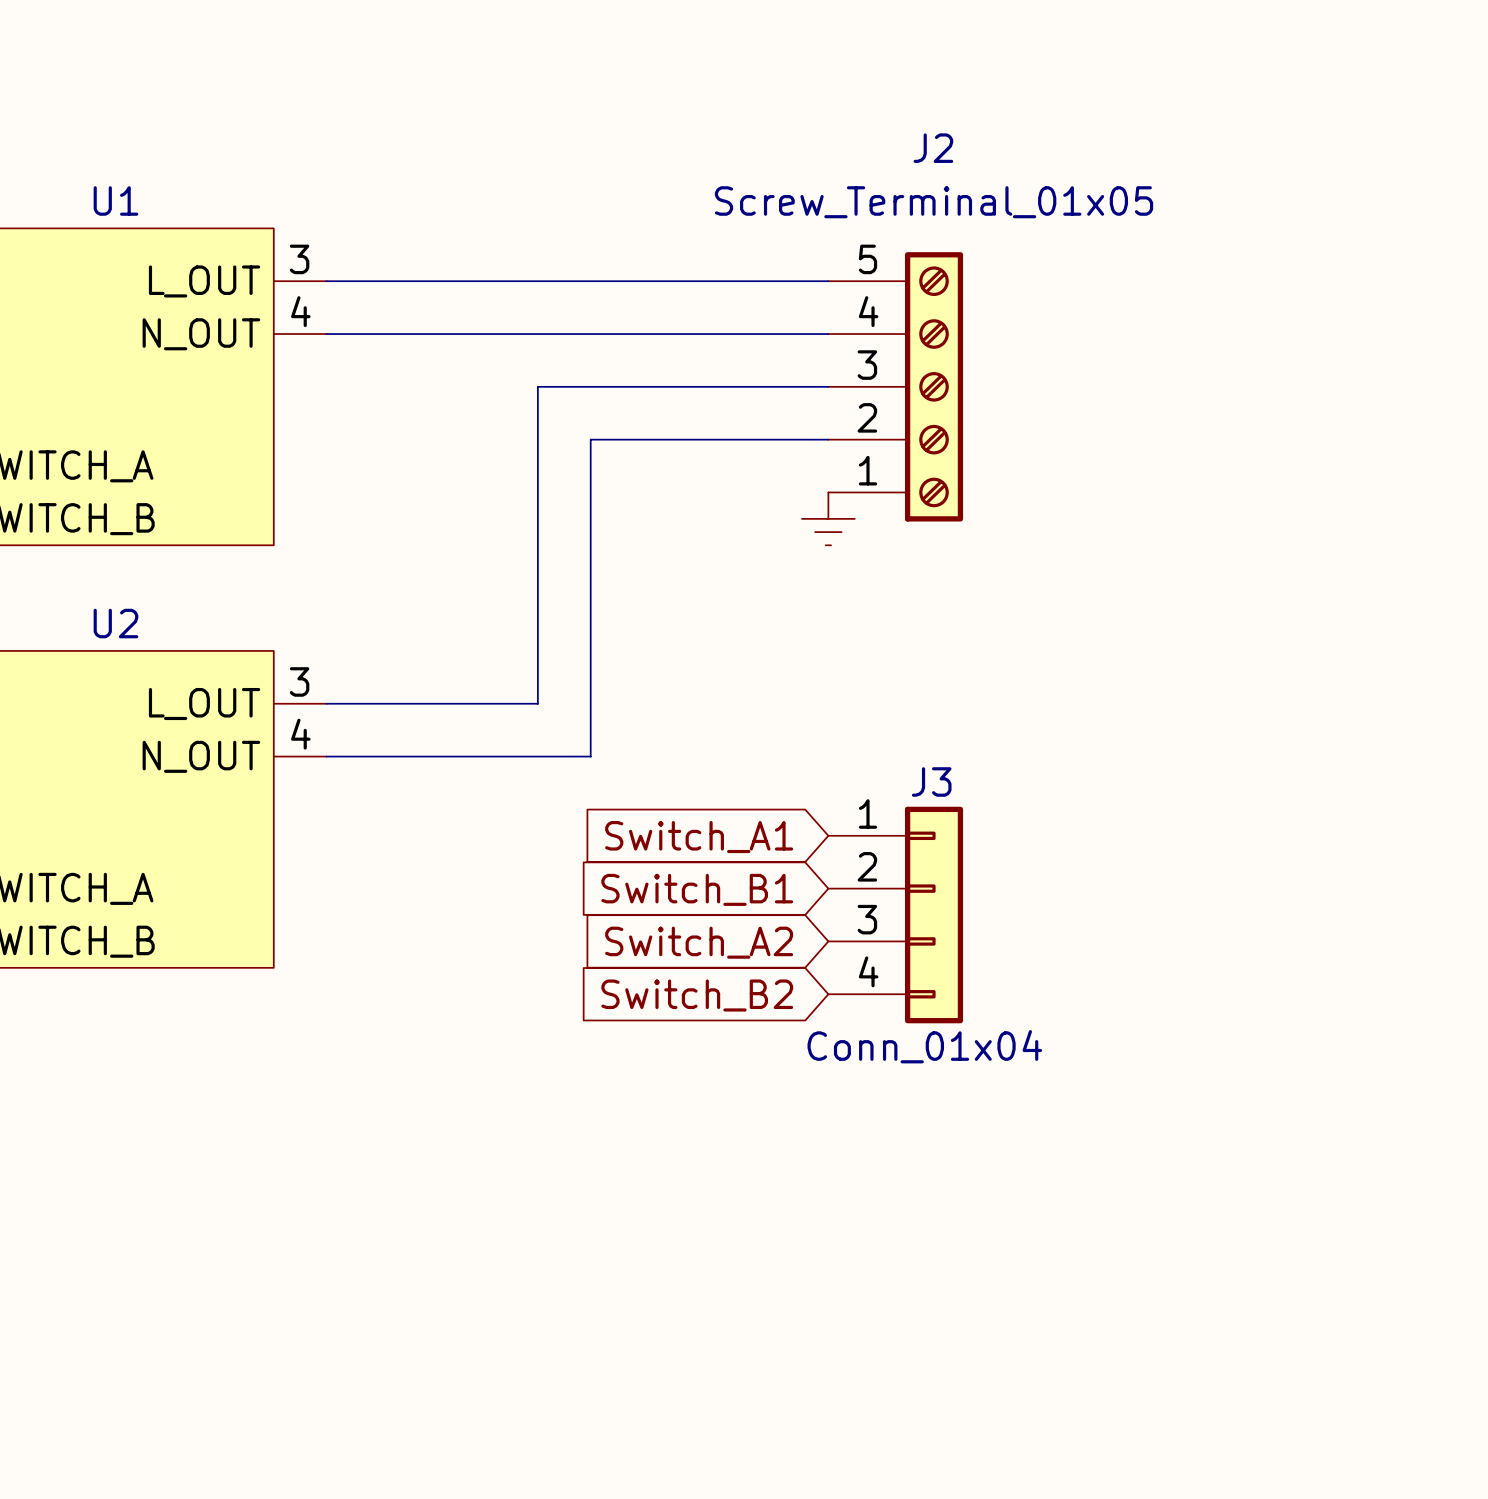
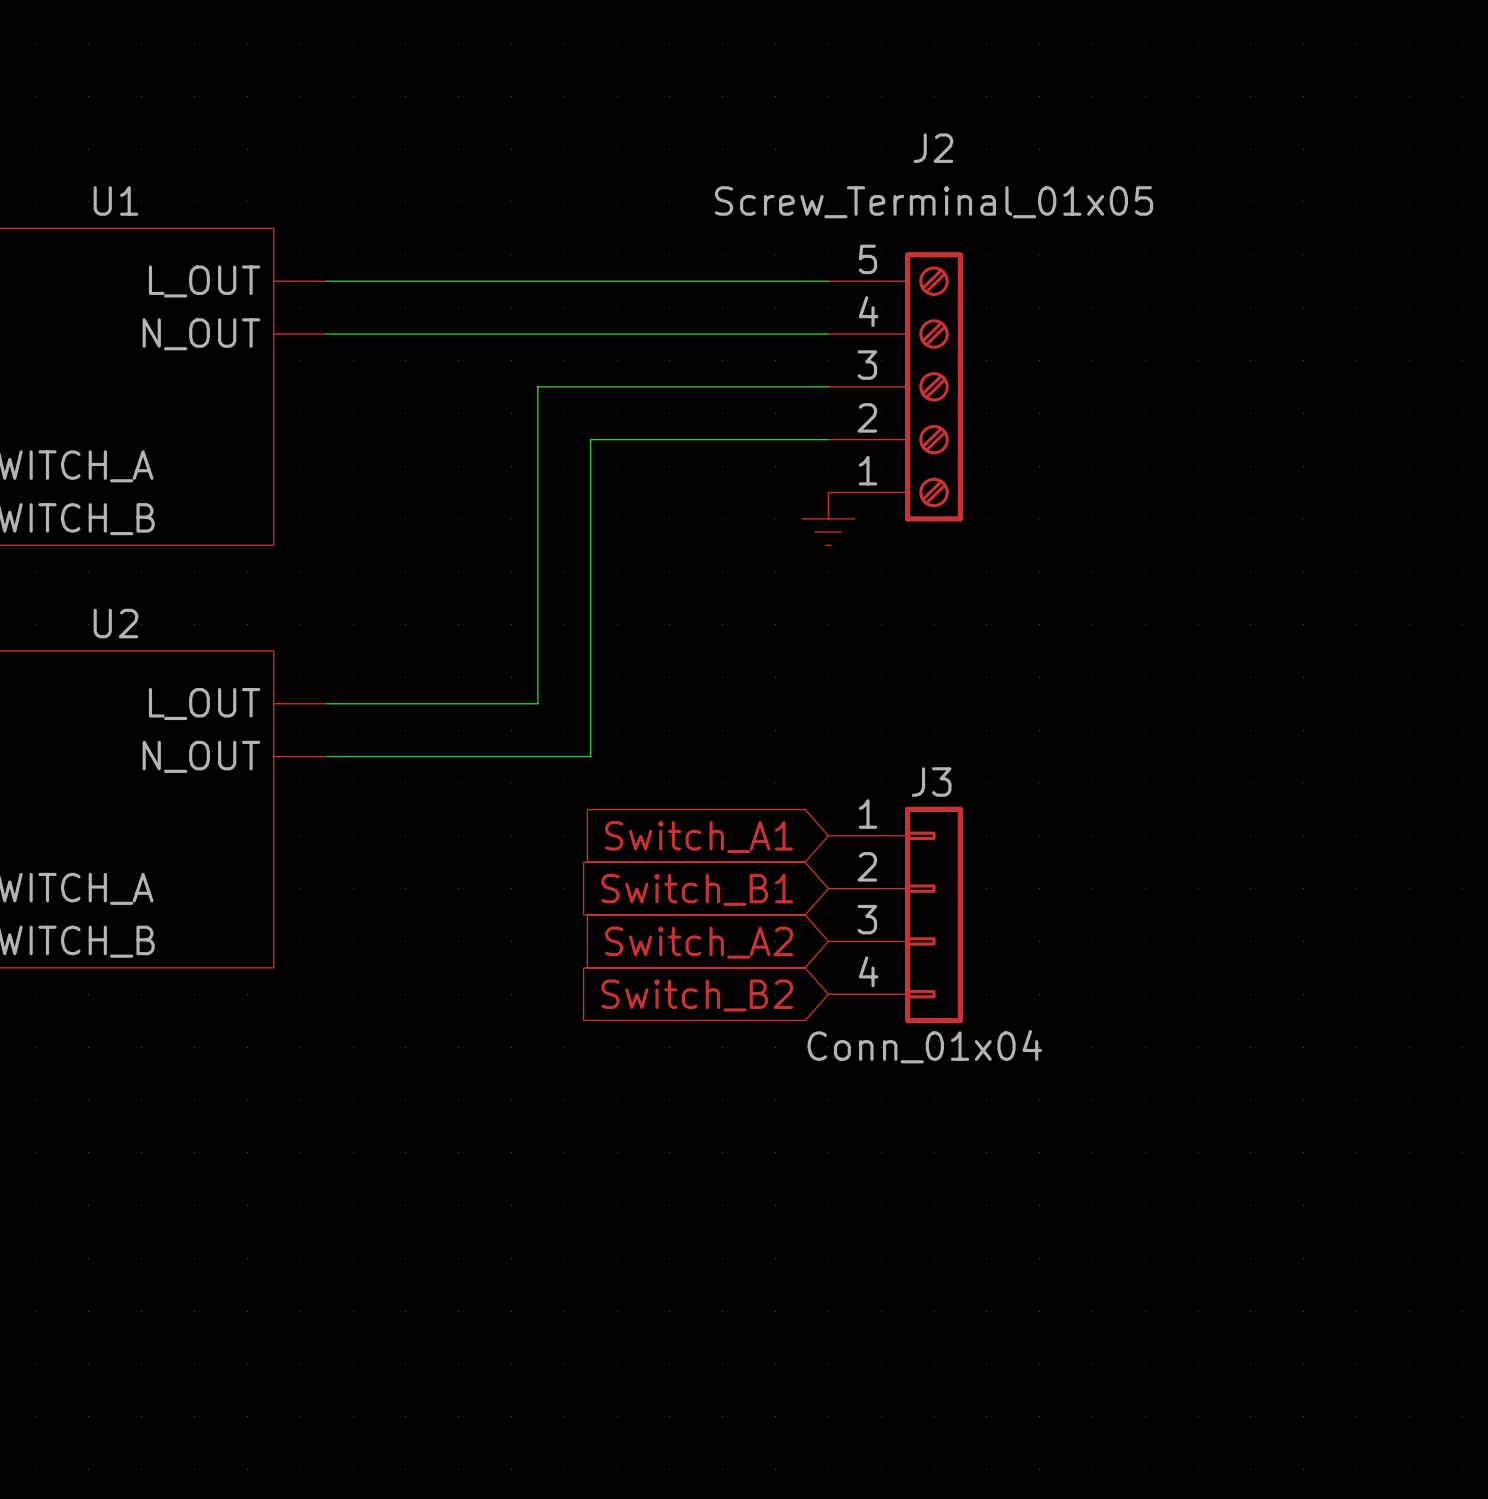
U1 pin number: 3 (299, 259) -> none
U1 pin number: 4 (300, 311) -> none
U2 pin number: 3 (299, 681) -> none
U2 pin number: 4 (300, 734) -> none

